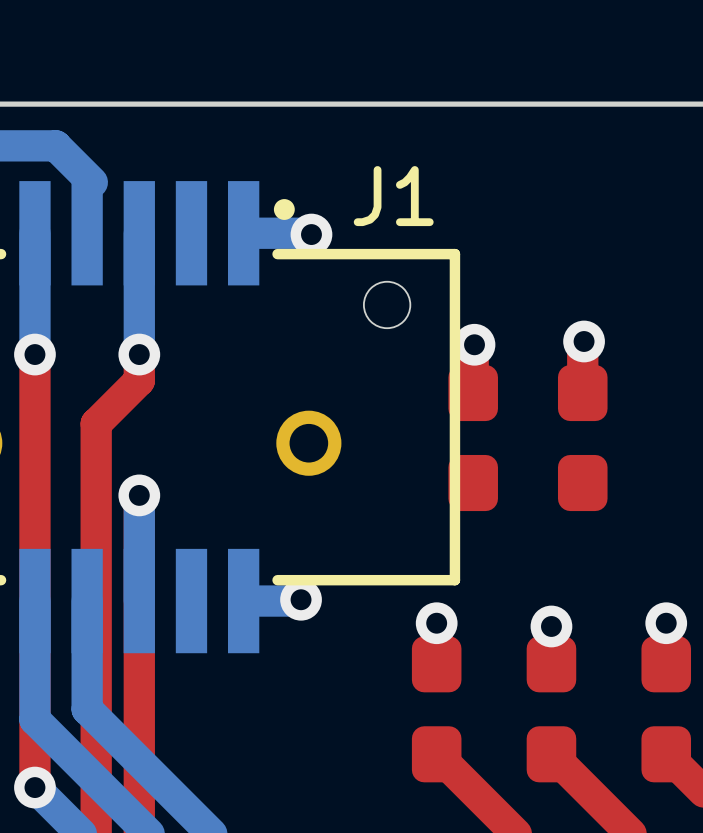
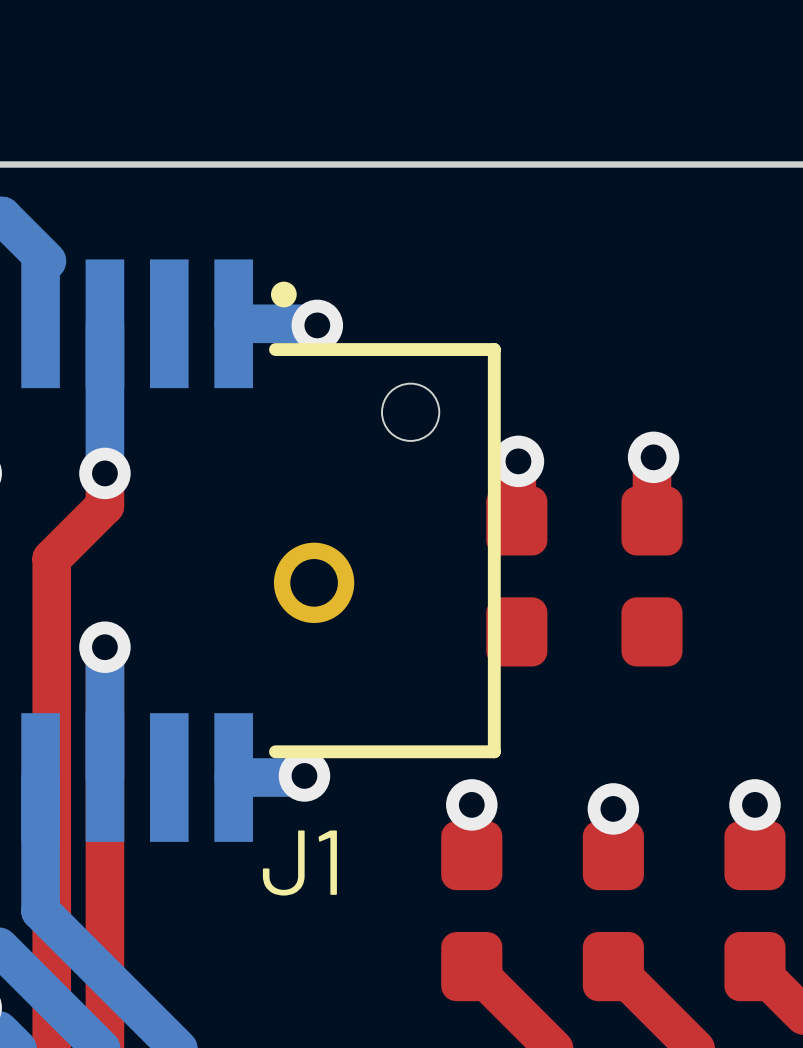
J1 name position: J1 (393, 196) -> J1 (299, 863)

